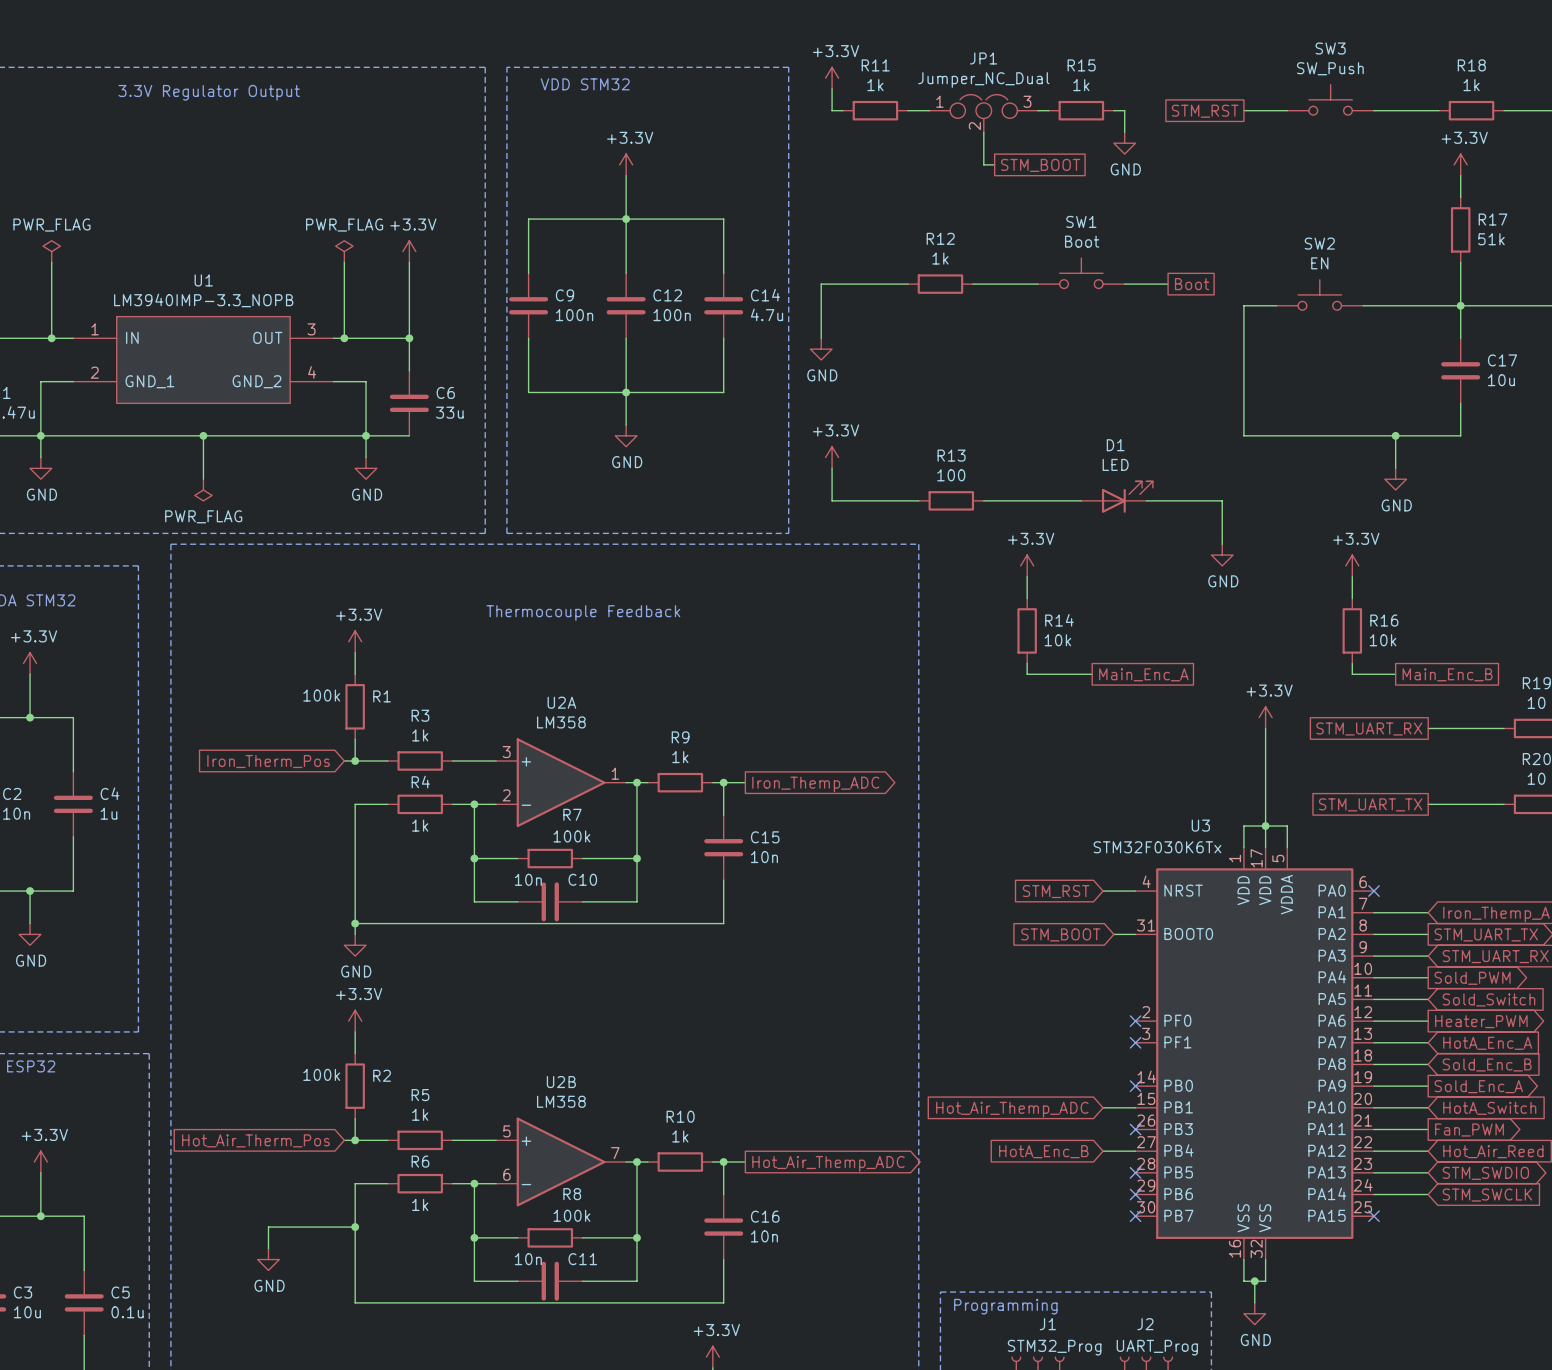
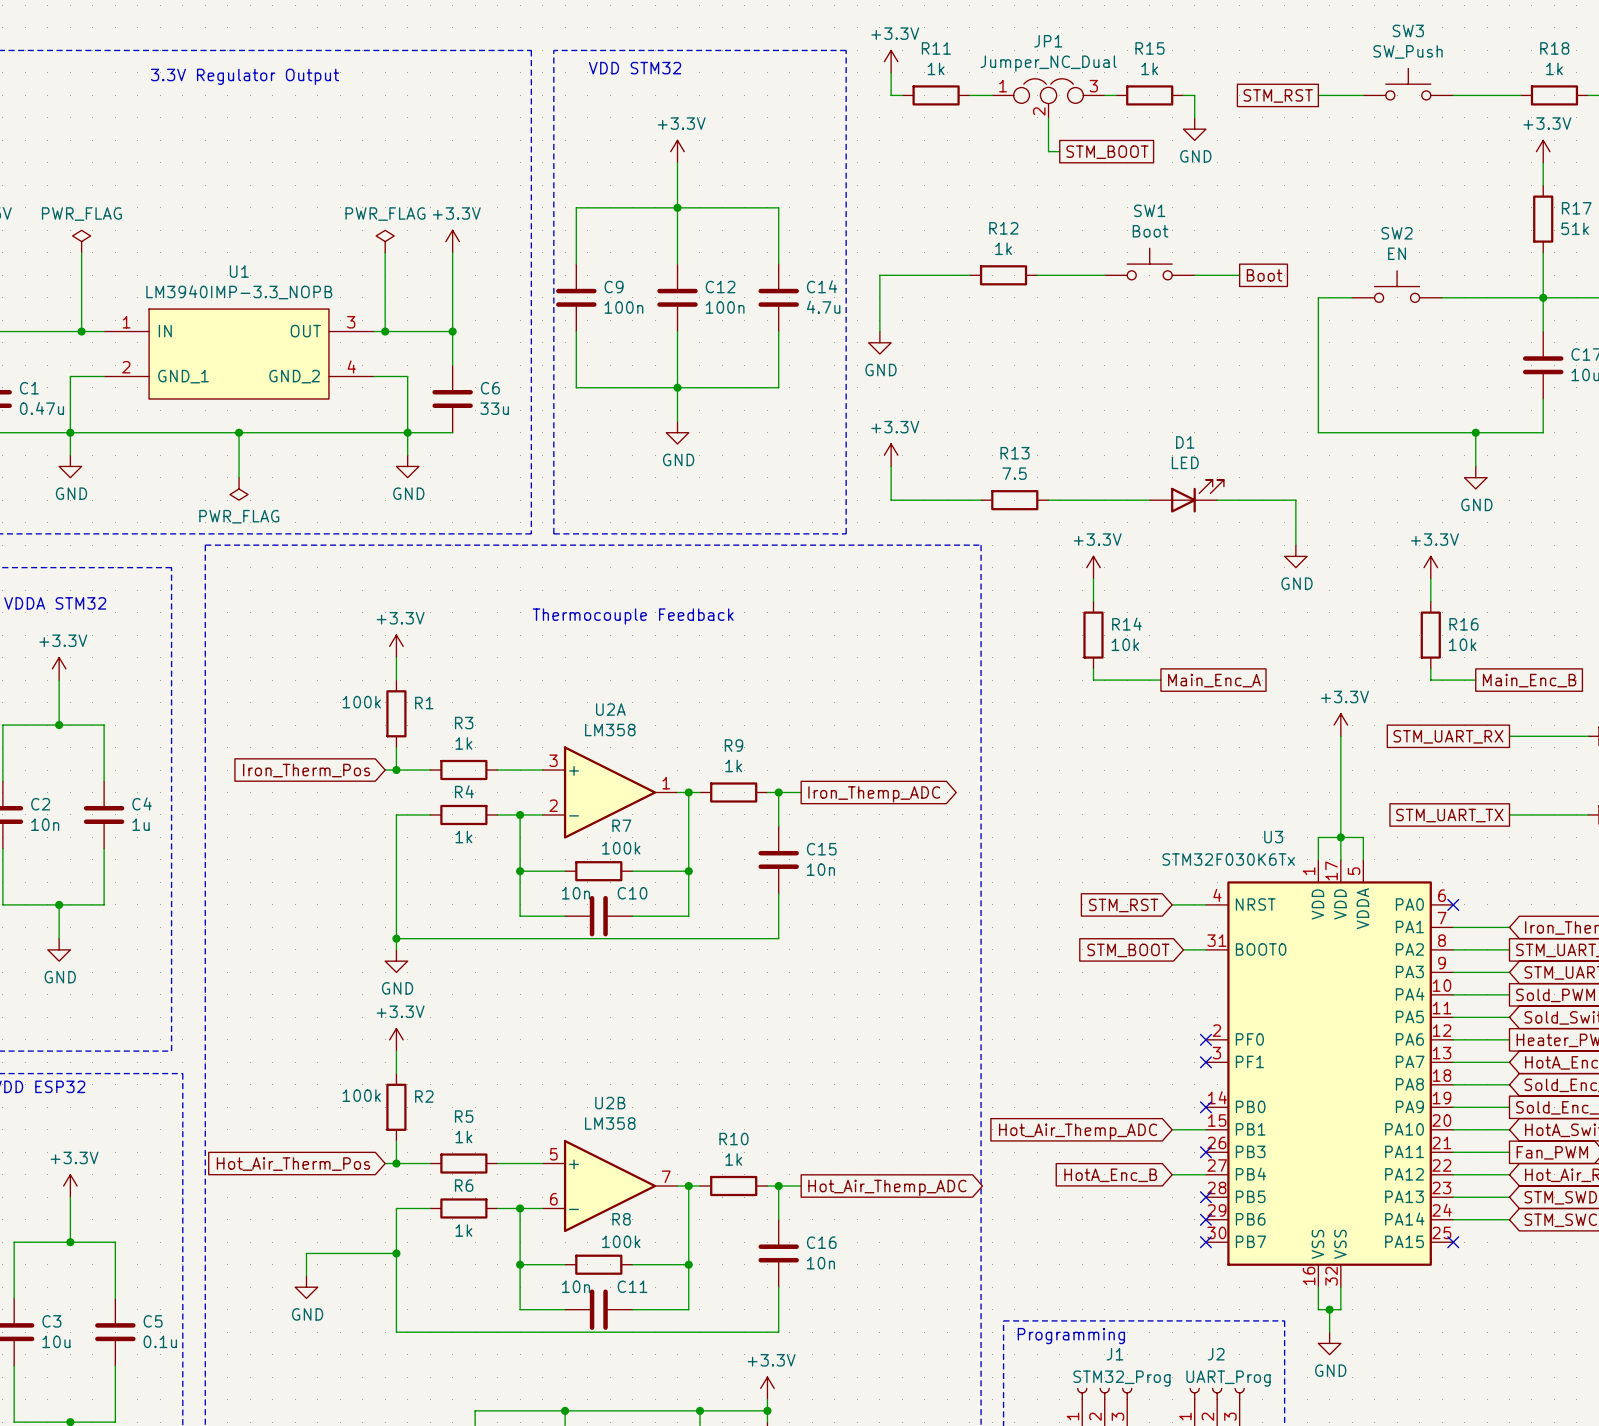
R13 value: 100 (951, 475) -> 7.5 (1014, 473)

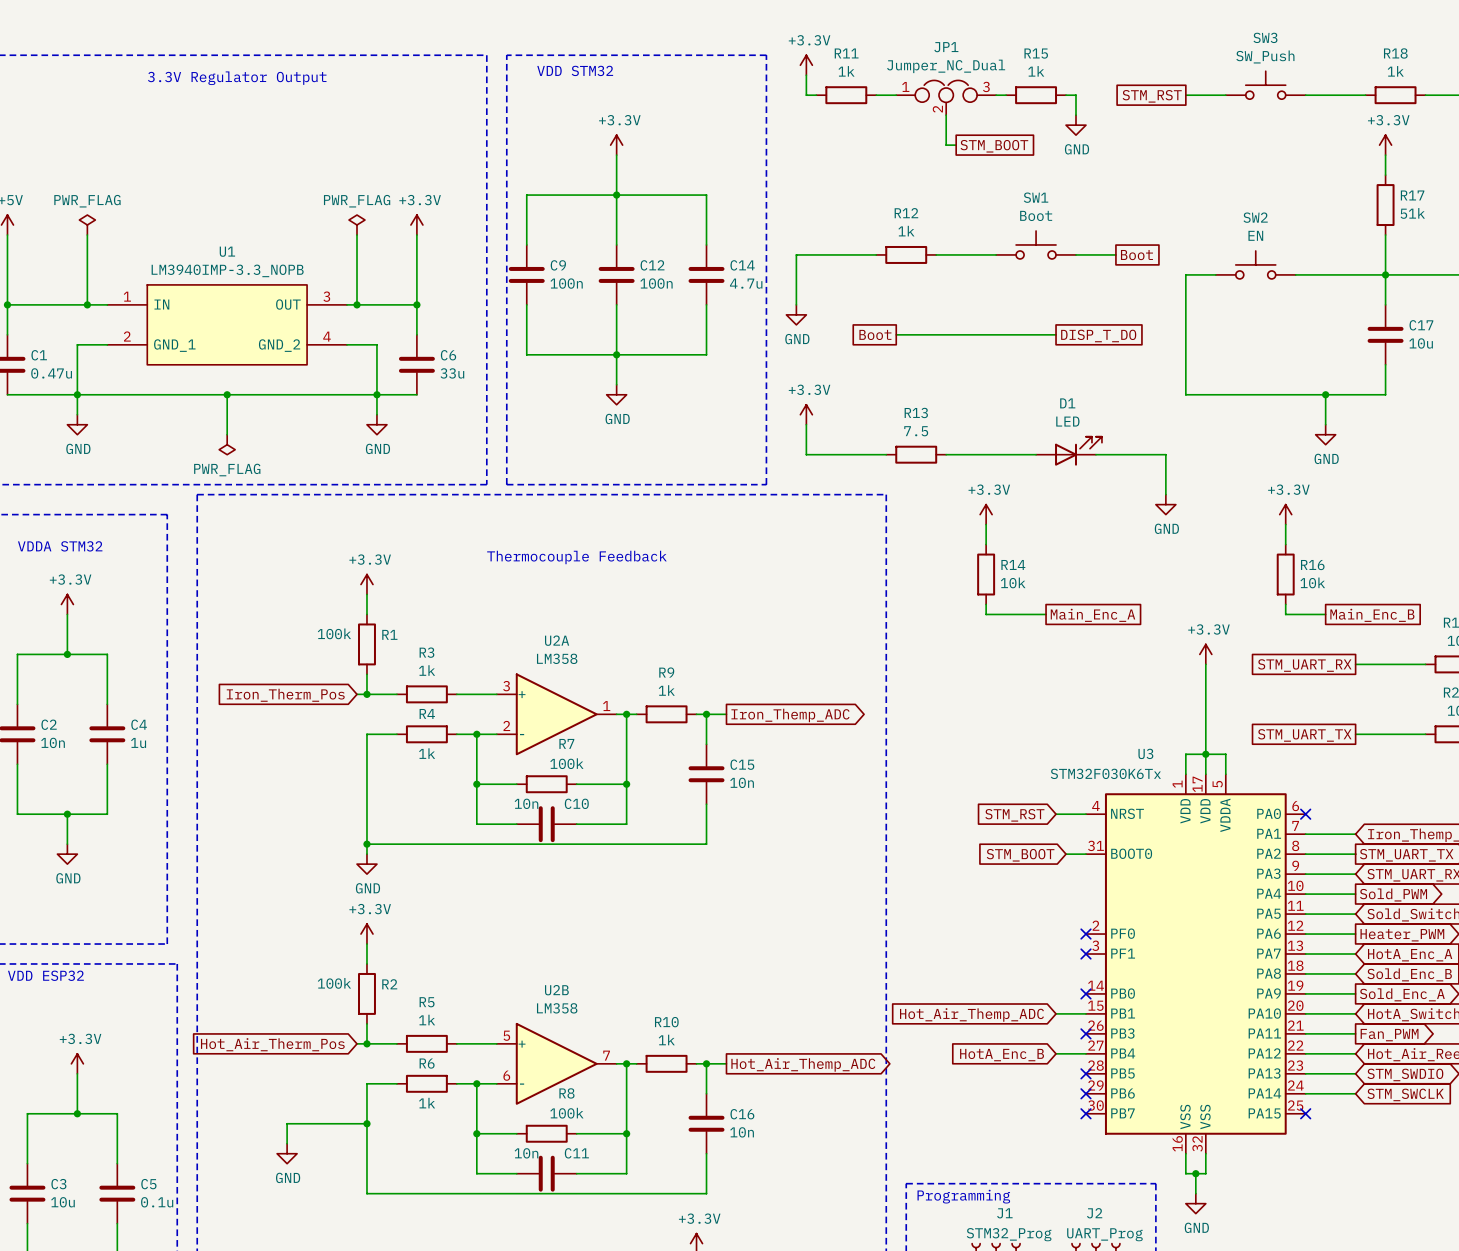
global label: none -> Boot (875, 334)
wire: none -> (896, 334) (1056, 334)
global label: none -> DISP_T_DO (1098, 335)

